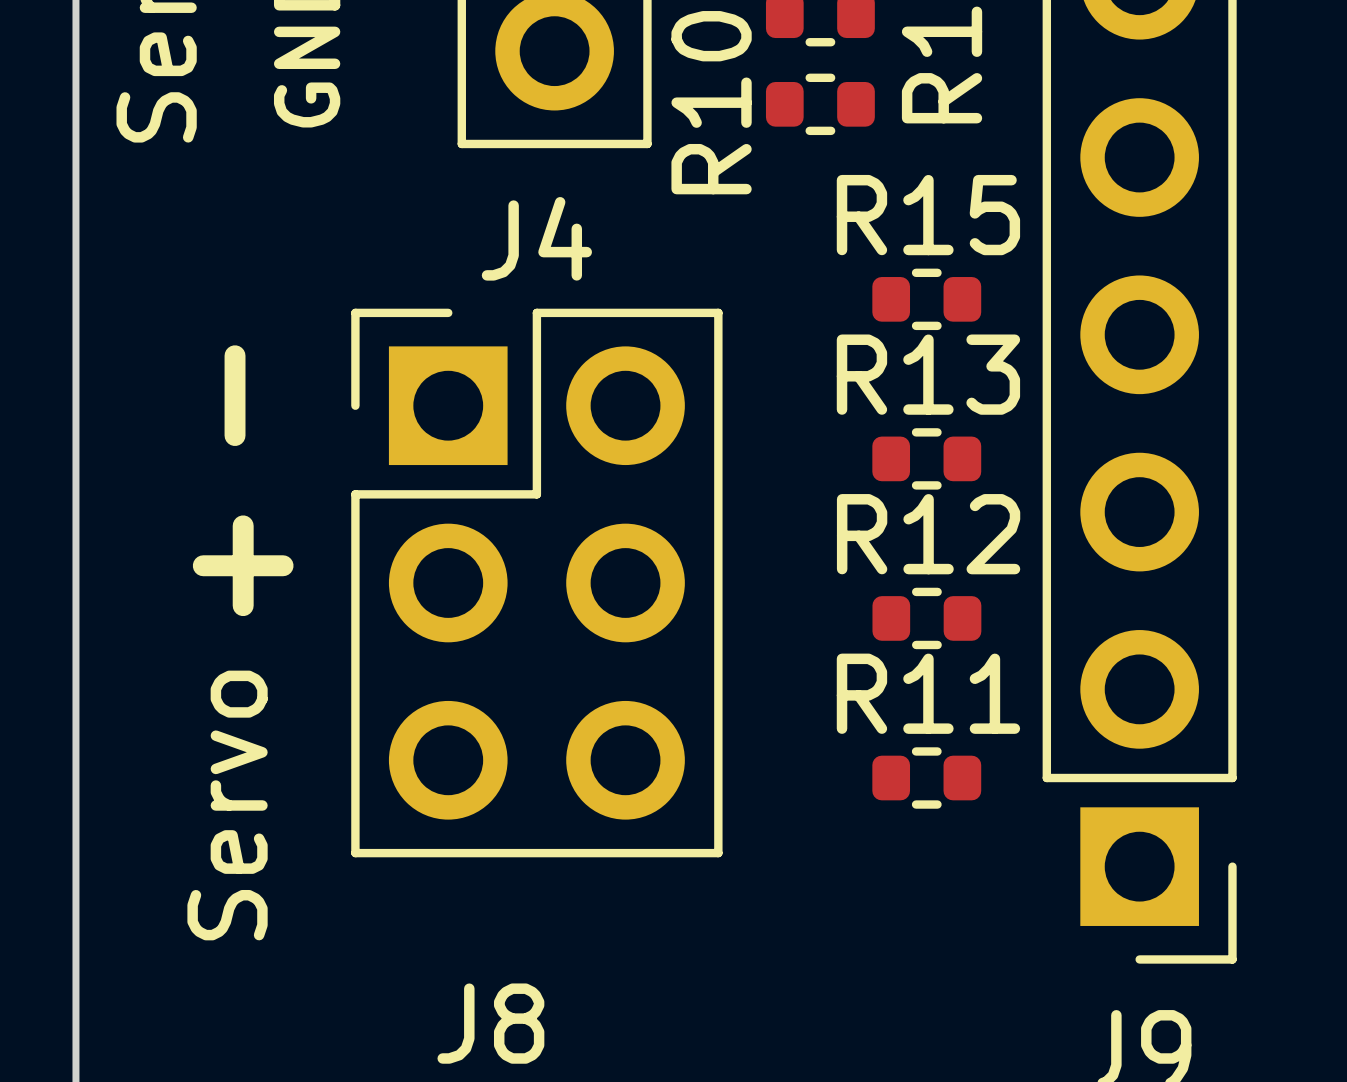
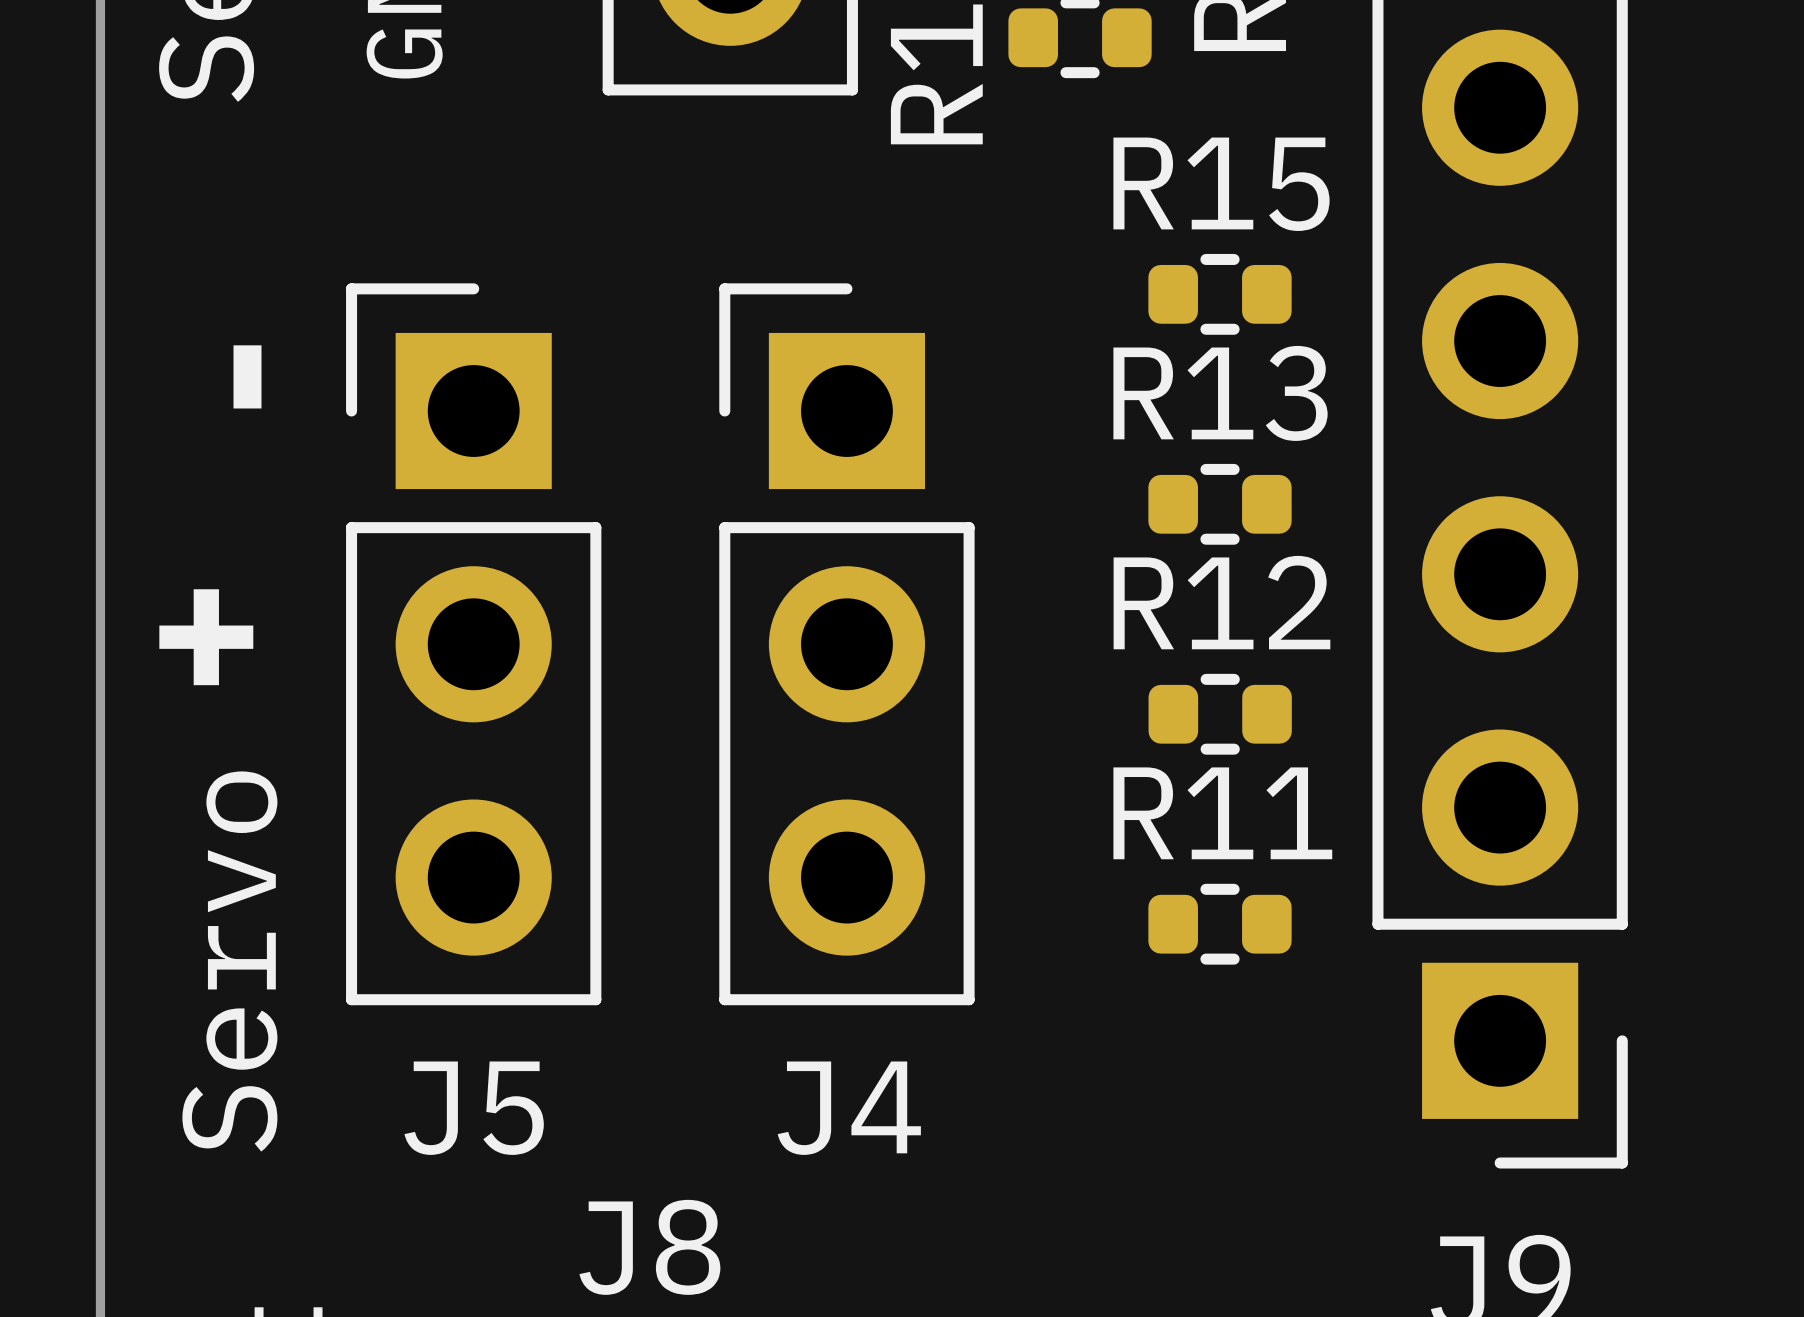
J4 name position: J4 (536, 238) -> J4 (849, 1108)
J4 footprint: [351, 308, 723, 858] -> [719, 283, 975, 1006]
text position: - (235, 395) -> - (247, 376)
text position: + (243, 565) -> + (206, 637)
J5: none -> (473, 644)
text position: Servo (227, 805) -> Servo (229, 961)

